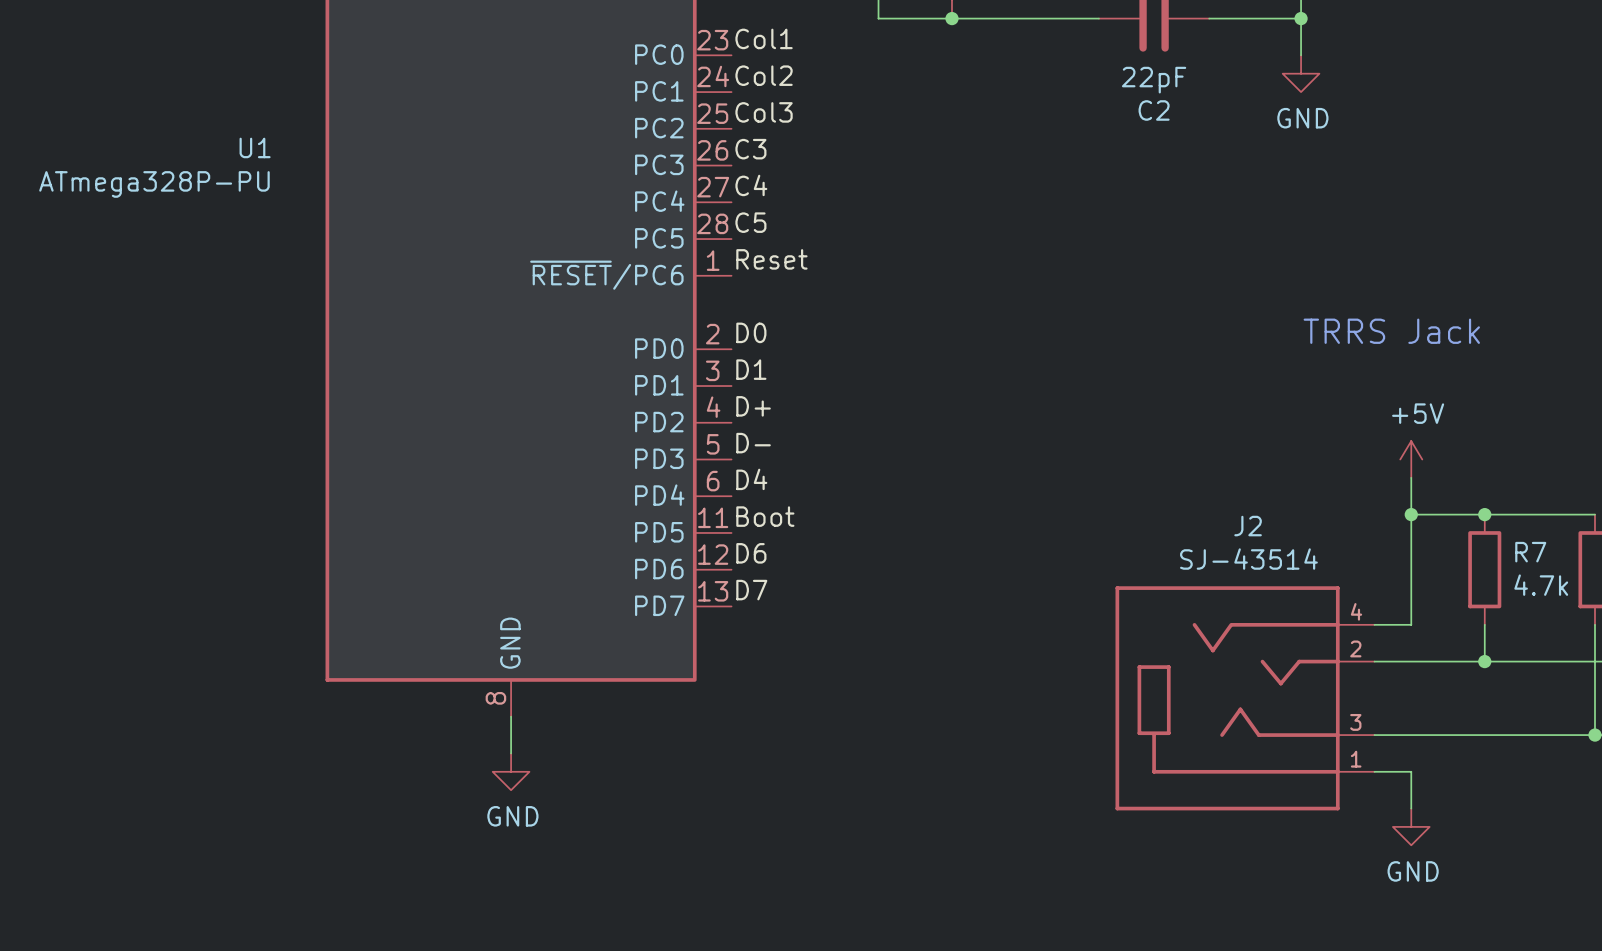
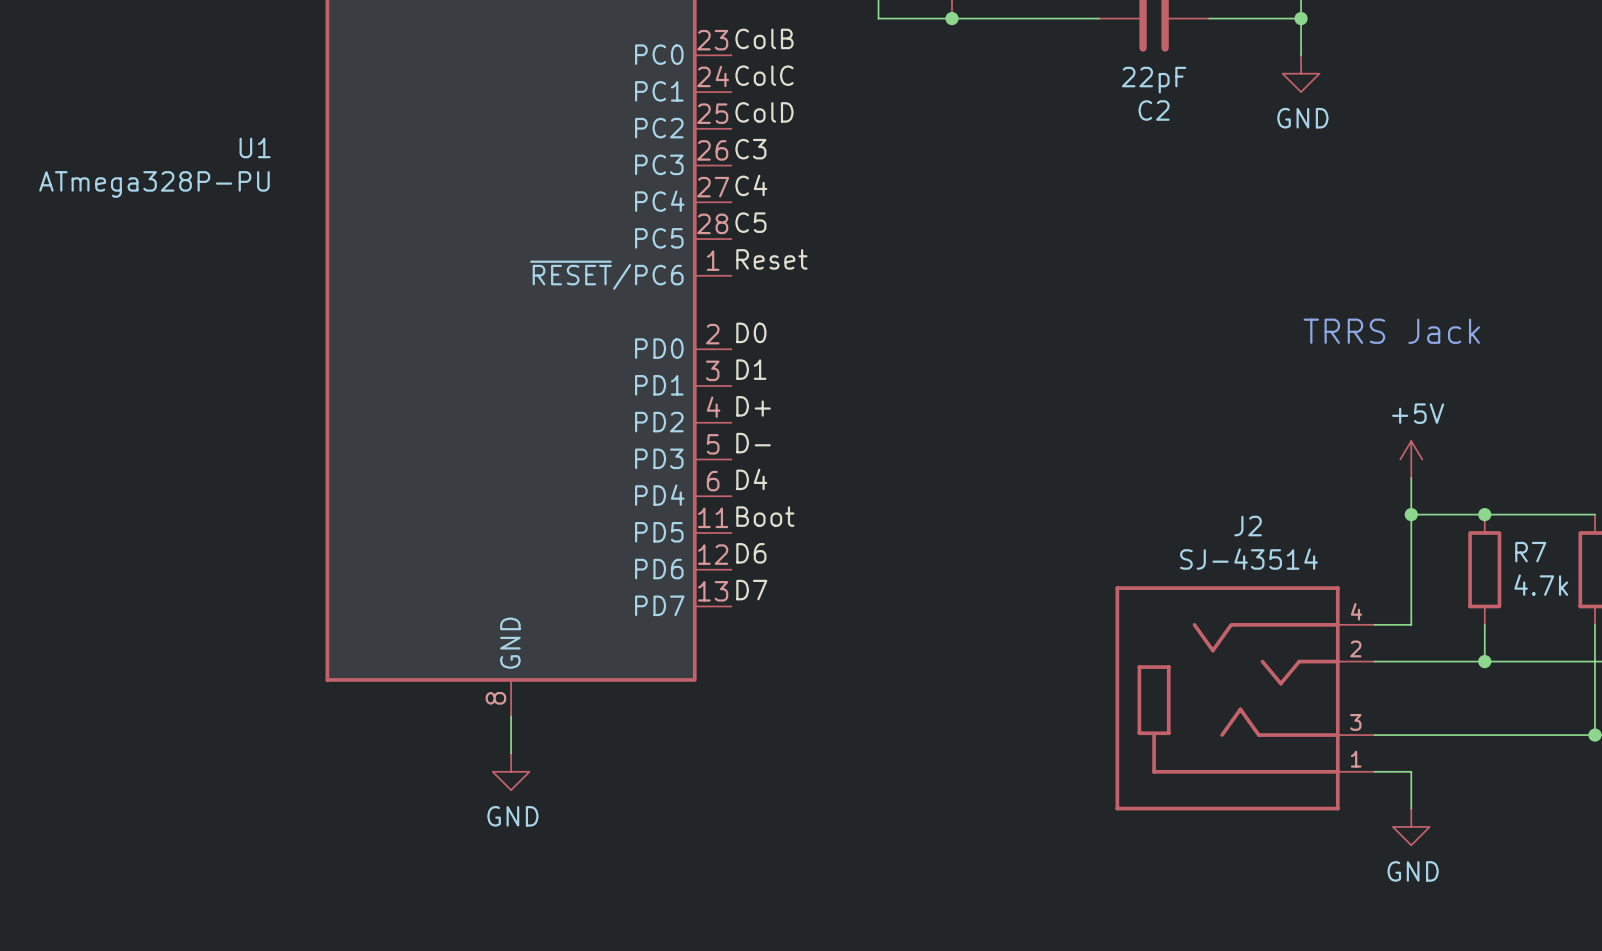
label: Col1 (764, 38) -> ColB (764, 38)
label: Col2 (764, 75) -> ColC (764, 75)
label: Col3 (764, 112) -> ColD (764, 112)

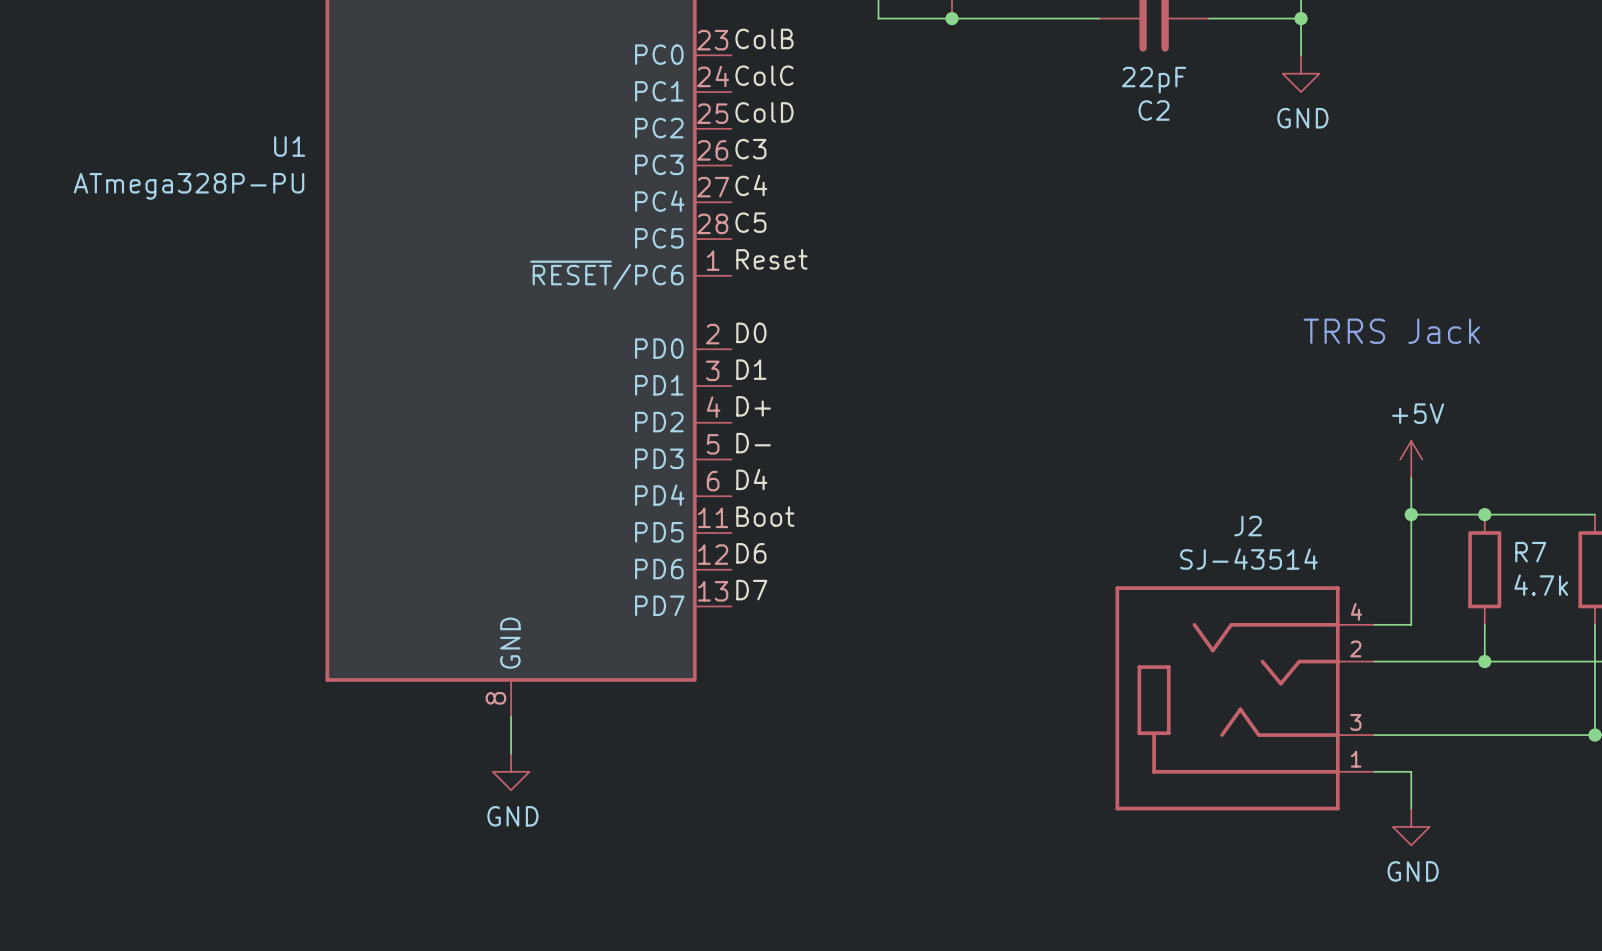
U1 name position: U1 (255, 147) -> U1 (289, 146)
U1 value position: ATmega328P-PU (154, 184) -> ATmega328P-PU (189, 186)

